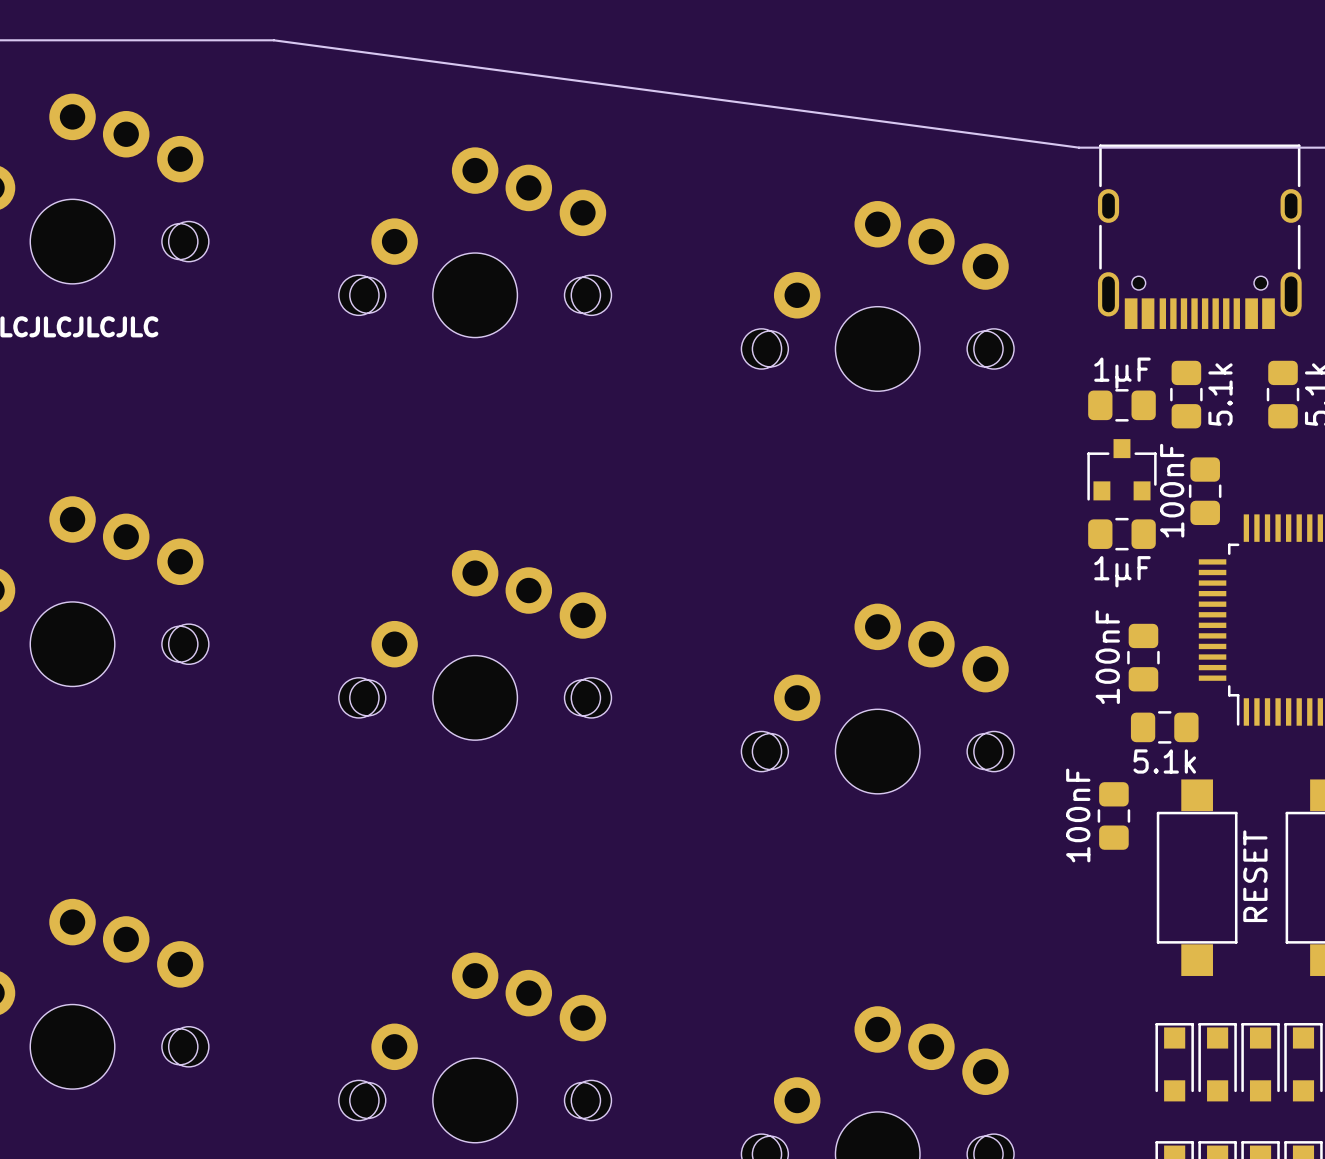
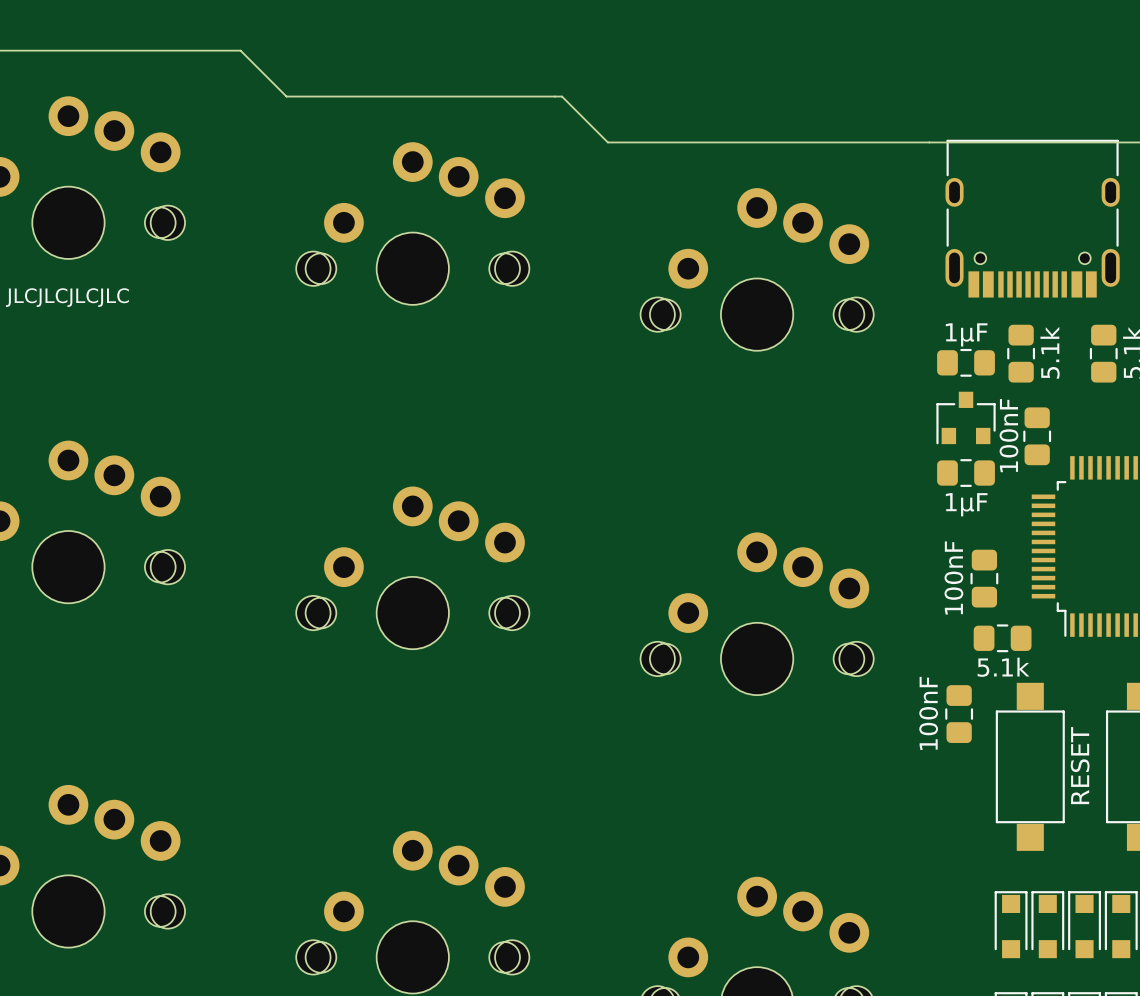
board edge: (273, 40) (1079, 147) -> (240, 50) (286, 96) (562, 96) (607, 142) (929, 142)

